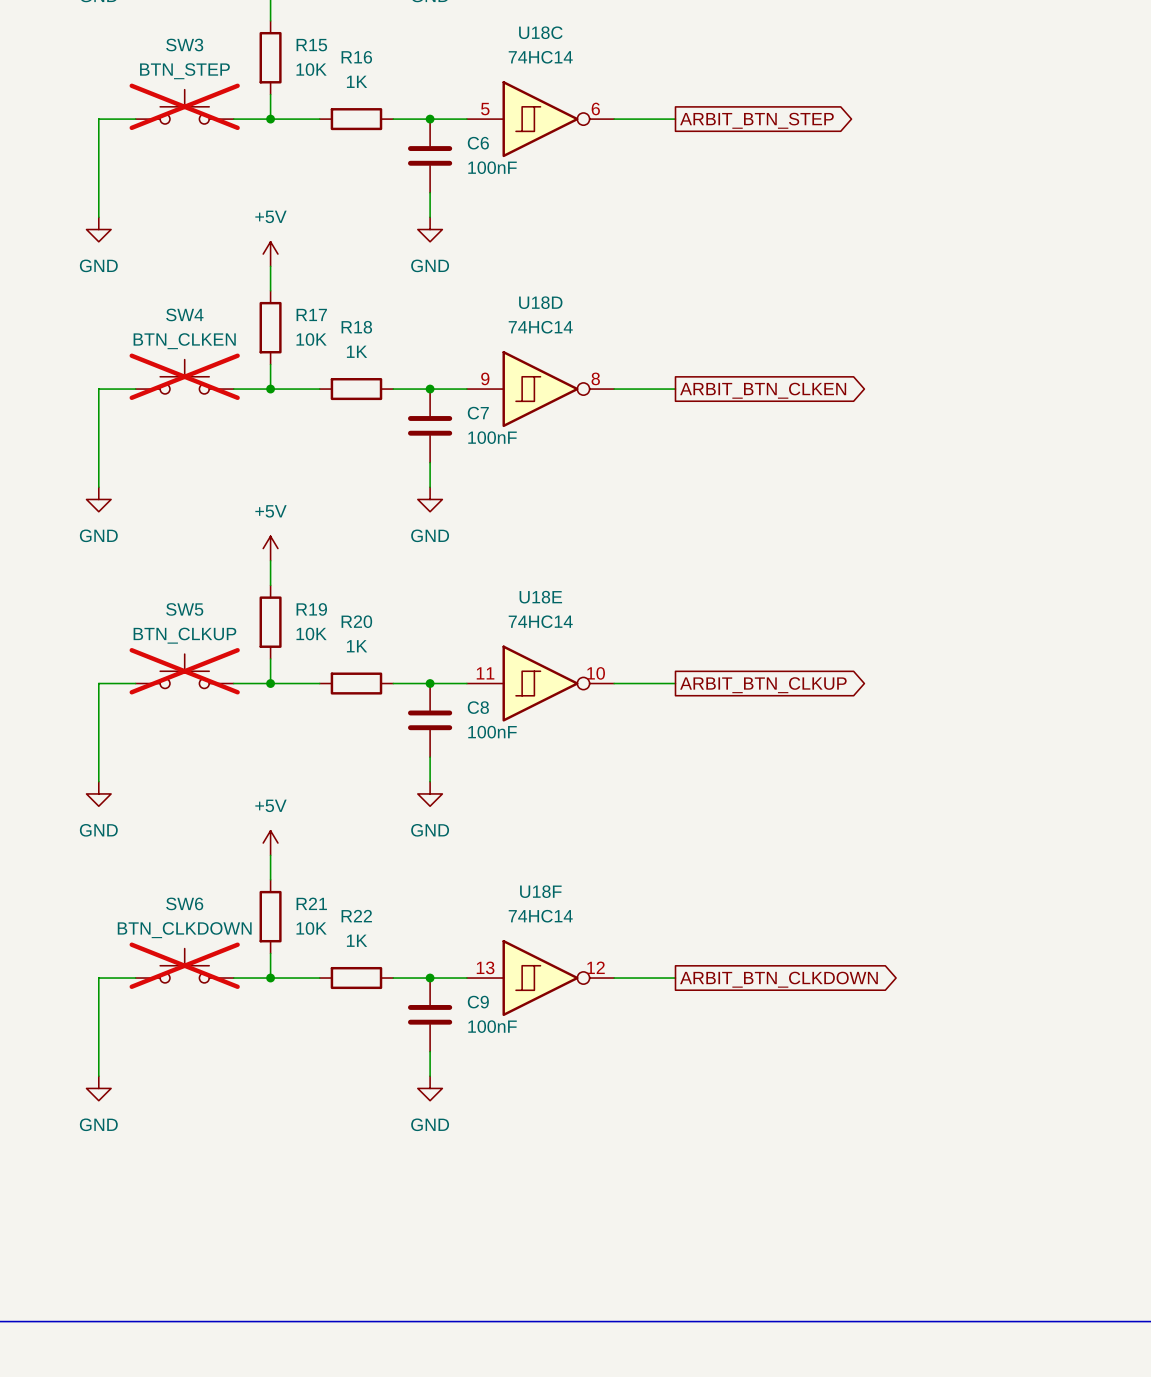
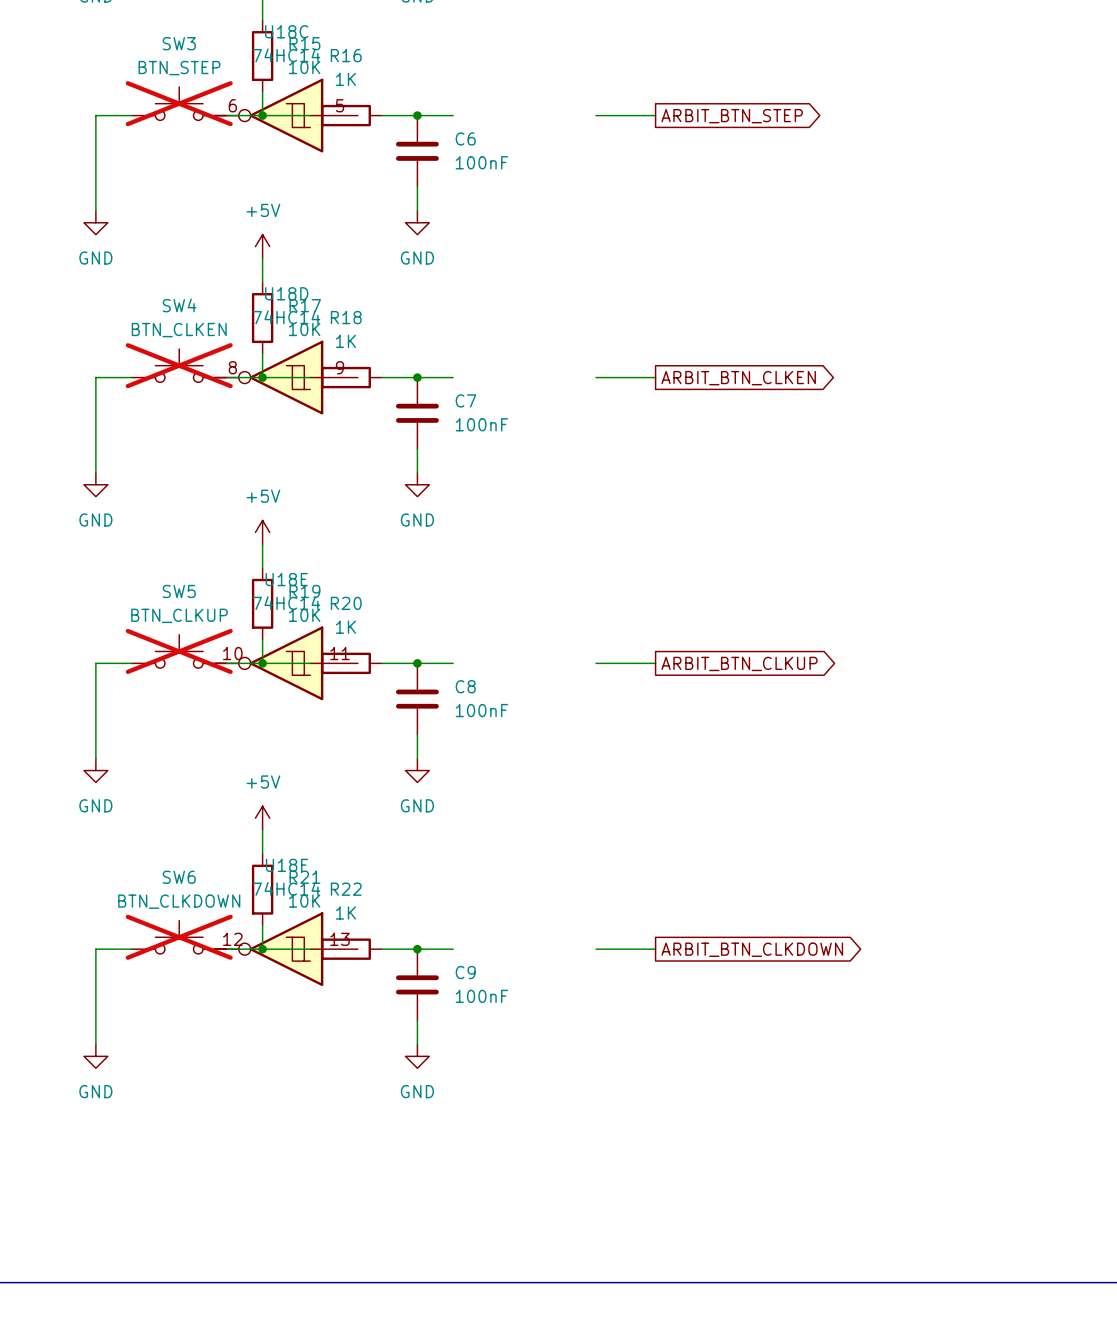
U18C flip: as is (540, 119) -> left-right (286, 115)
U18C position: (540, 119) -> (286, 115)
U18D flip: as is (540, 389) -> left-right (286, 377)
U18D position: (540, 389) -> (286, 377)
U18E flip: as is (540, 683) -> left-right (286, 663)
U18E position: (540, 683) -> (286, 663)
U18F flip: as is (540, 978) -> left-right (286, 949)
U18F position: (540, 978) -> (286, 949)

